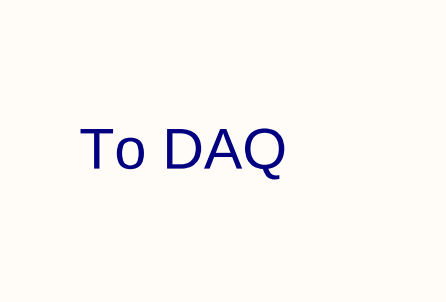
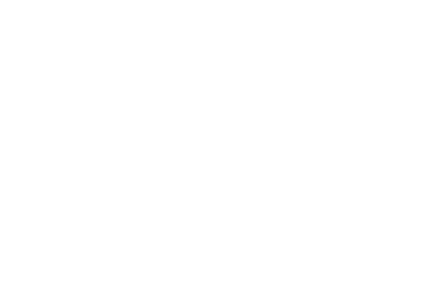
text: To DAQ (182, 153) -> none

